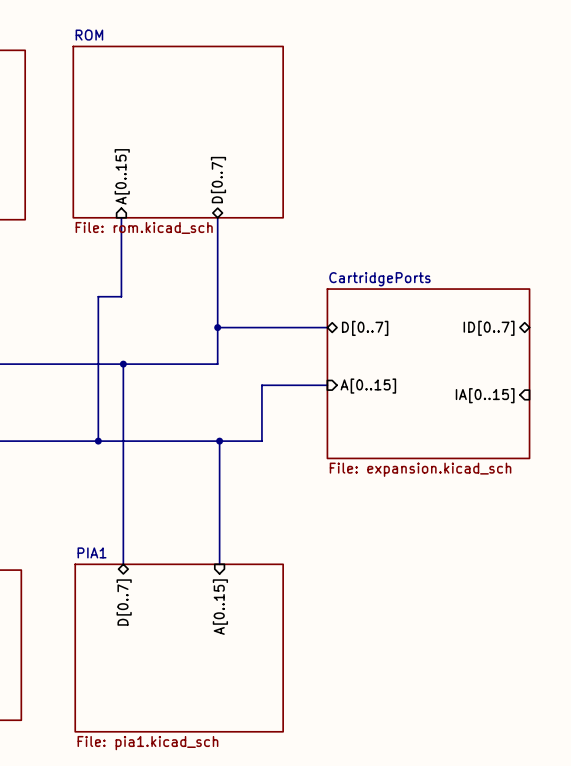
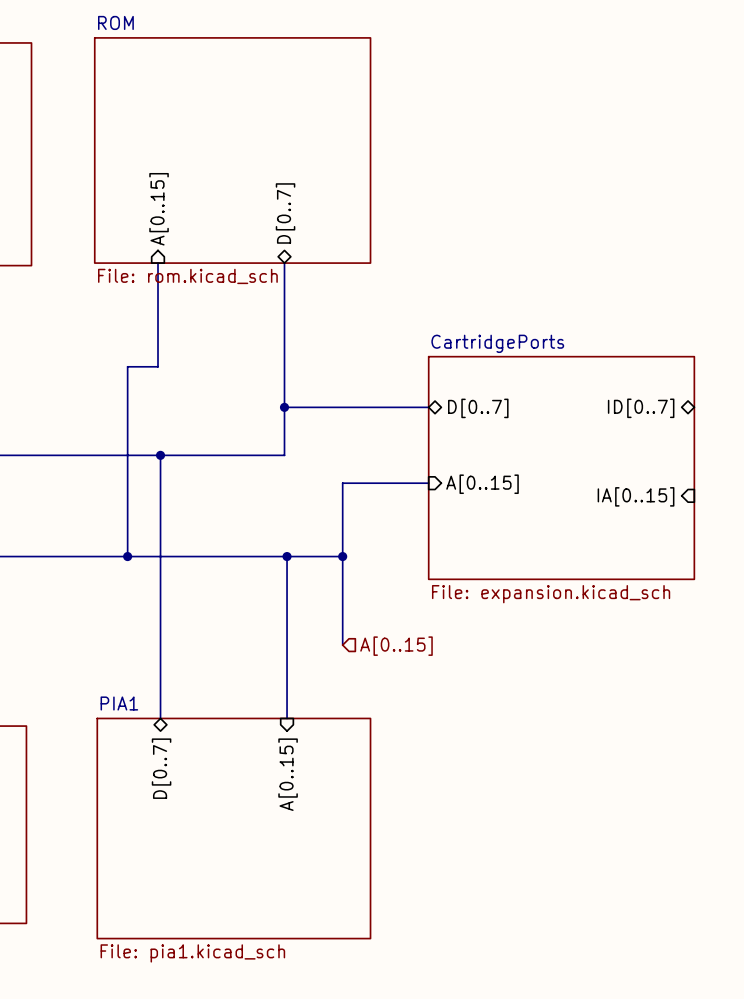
bus: none -> (342, 556) (342, 645)
junction: none -> (342, 556)
hierarchical label: none -> A[0..15] (396, 646)

